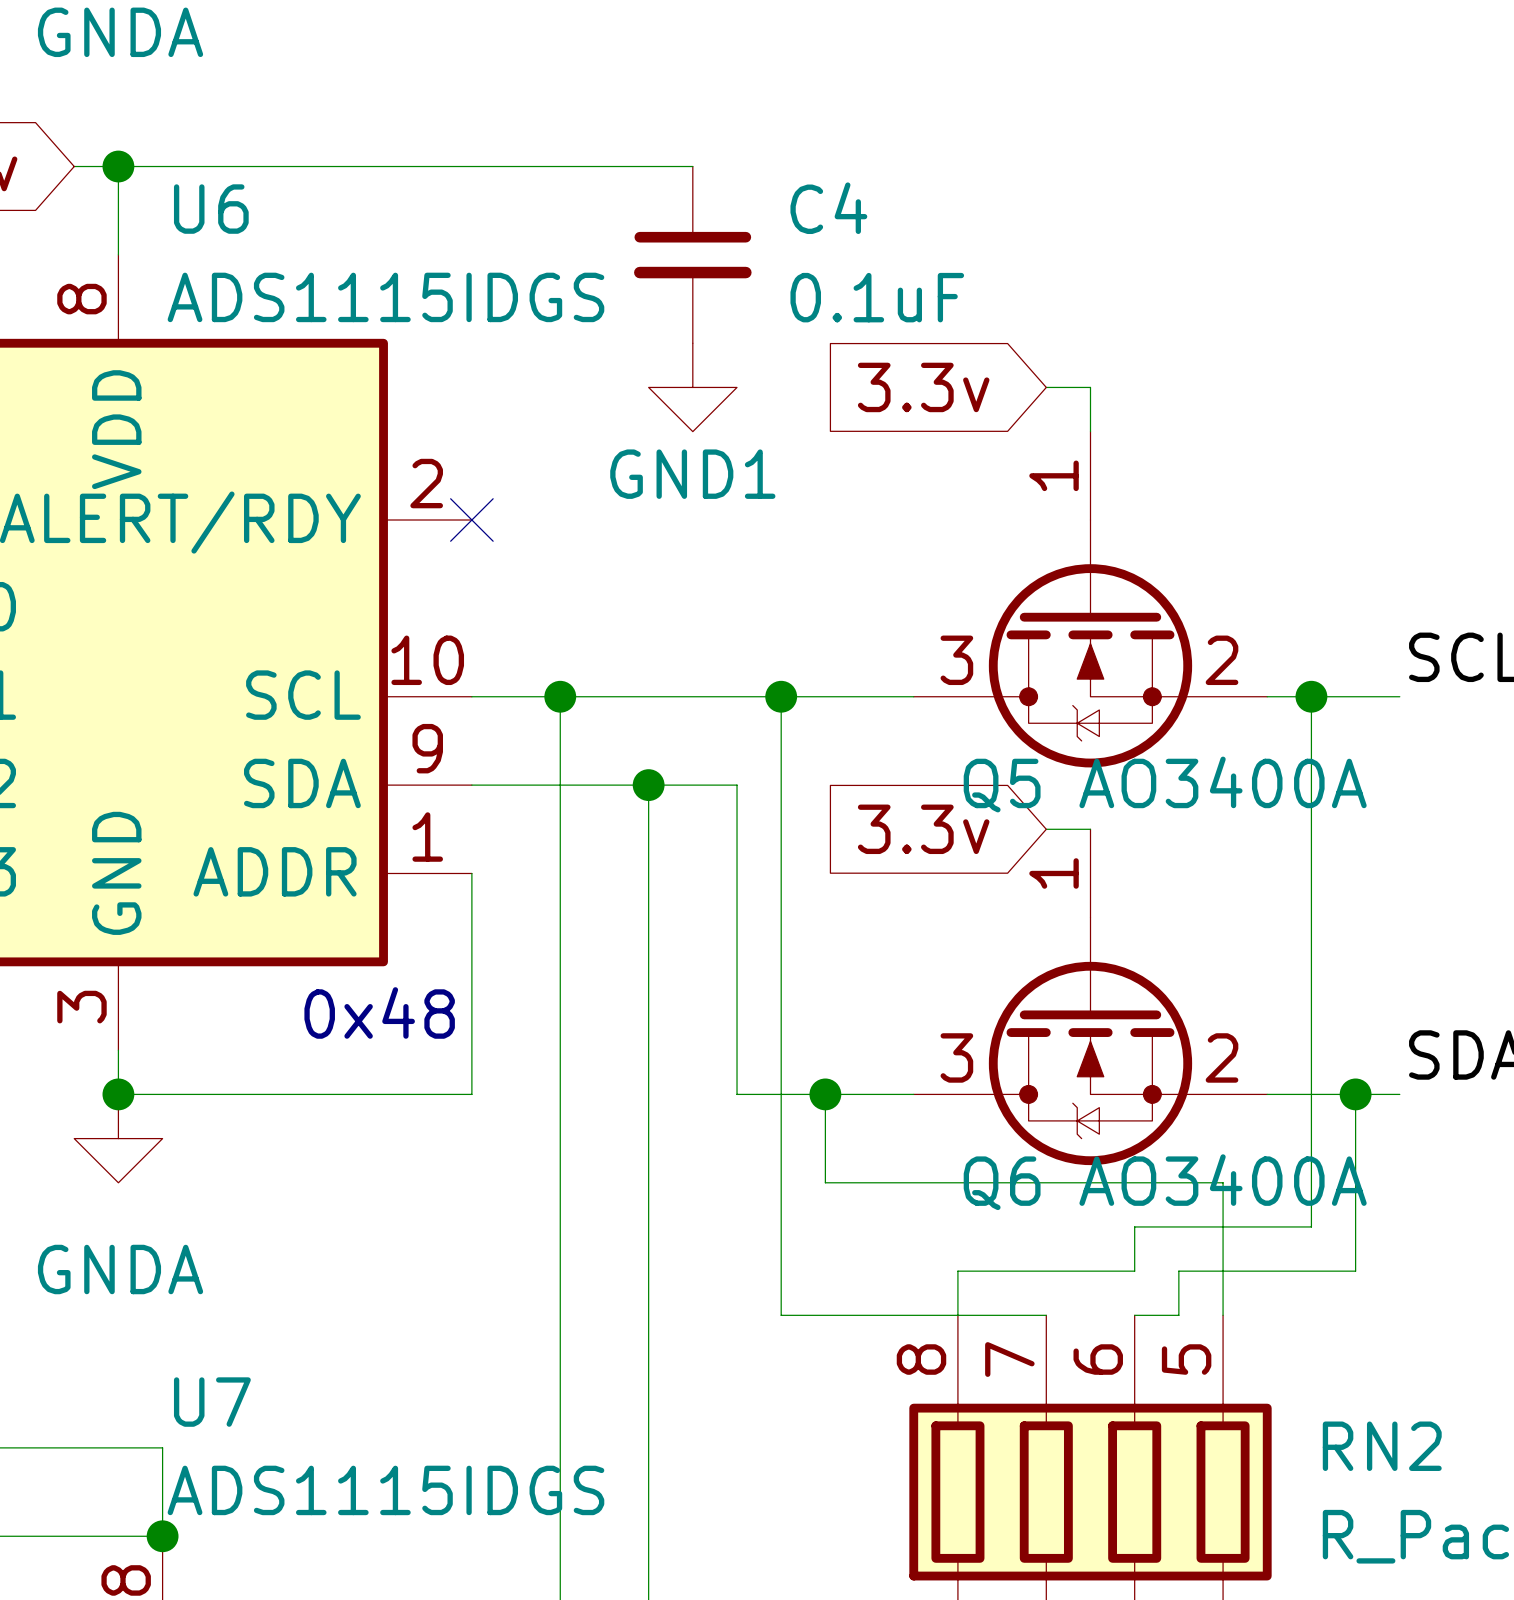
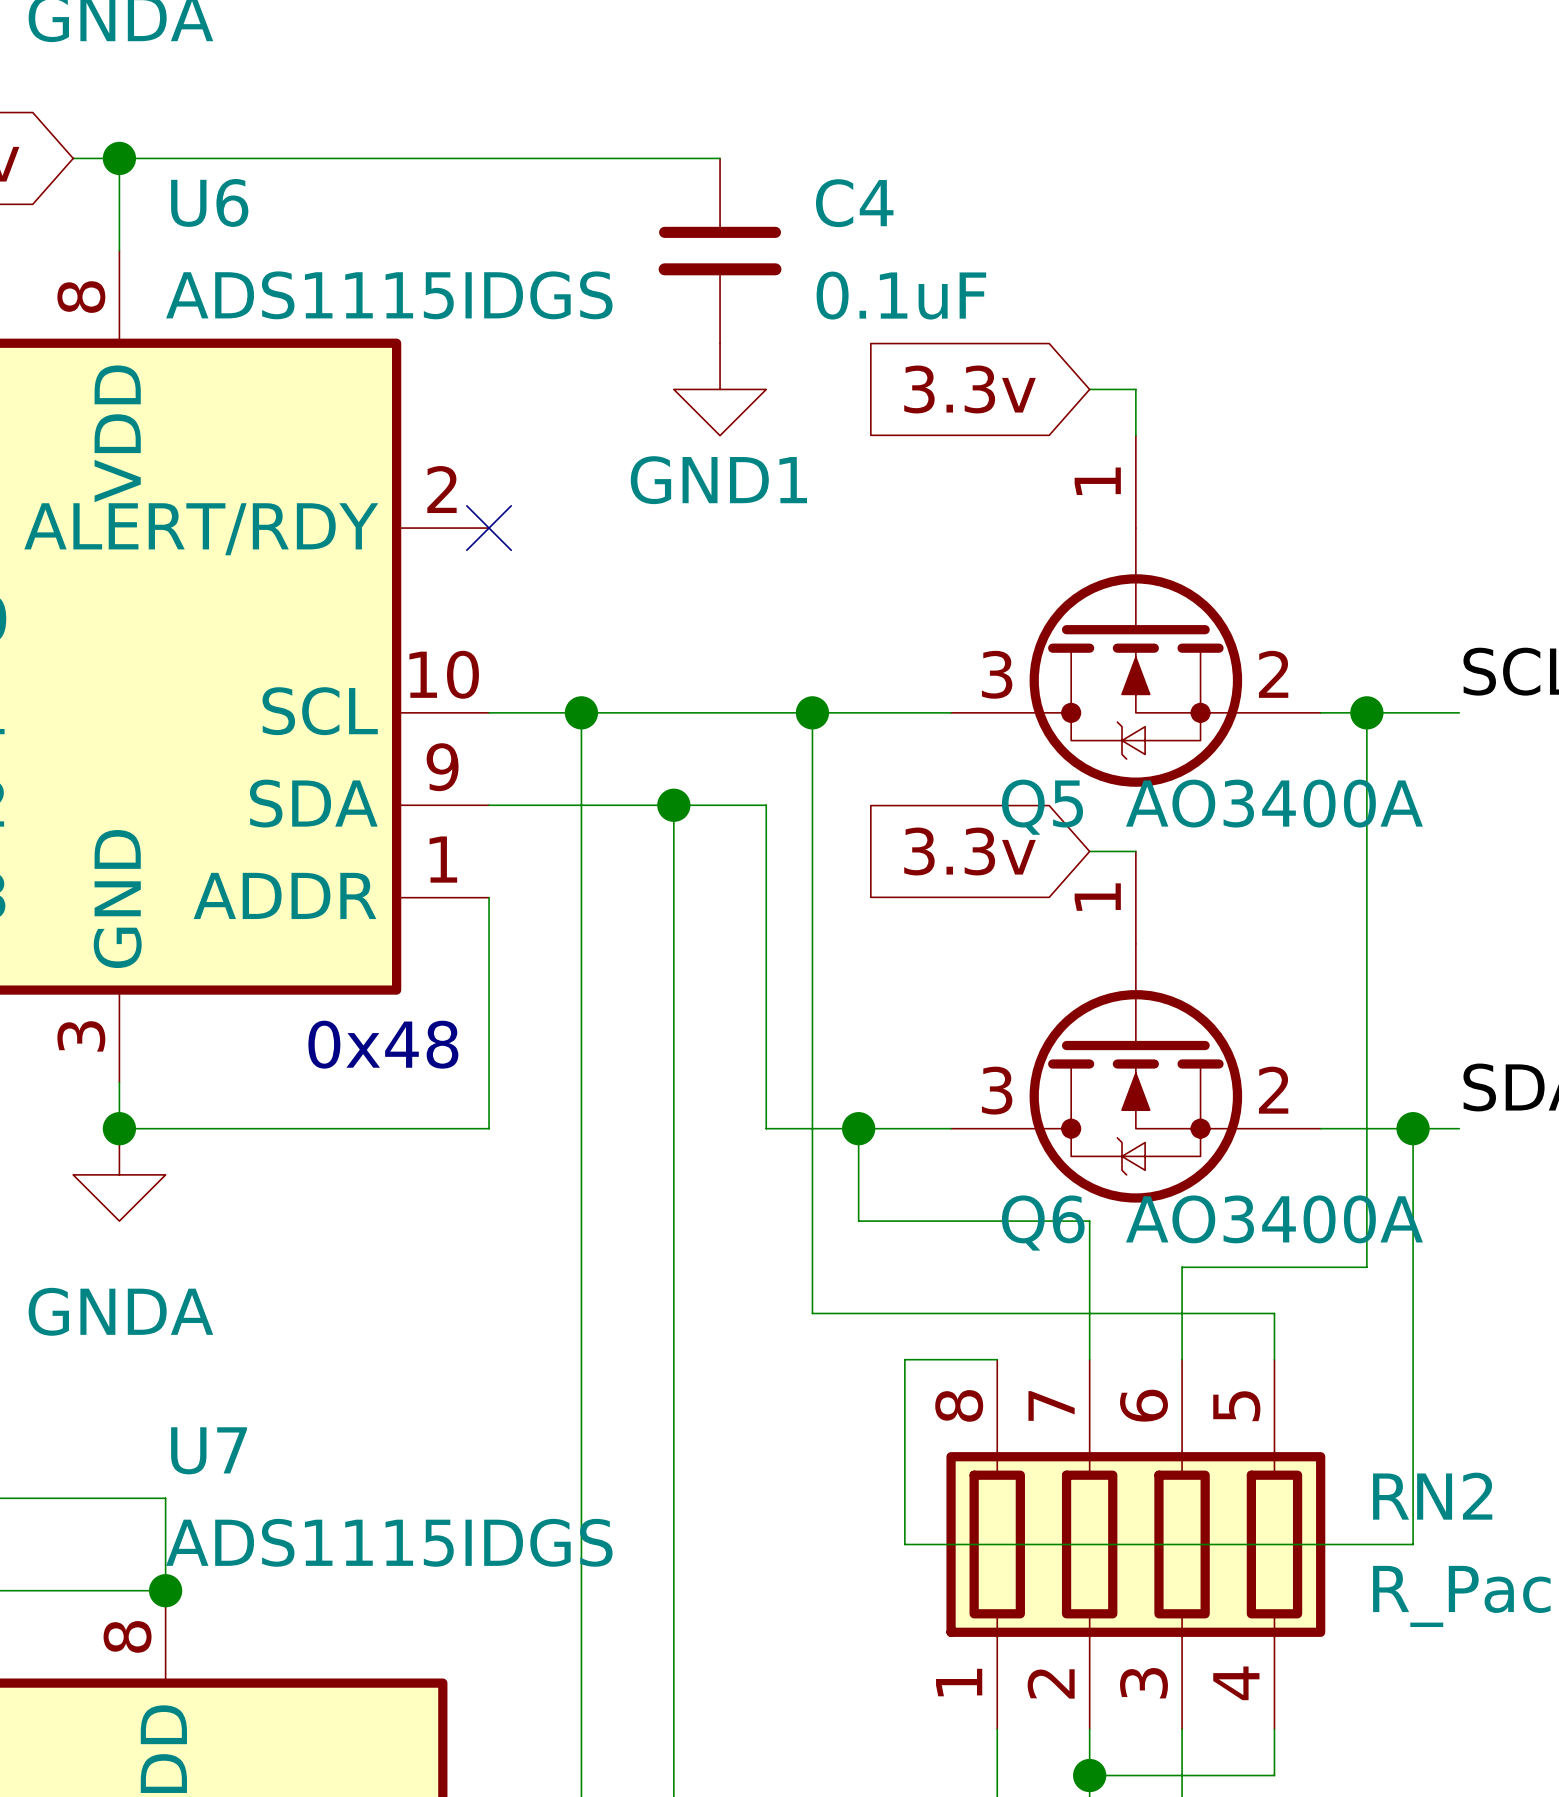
wire: (1046, 1182) (1223, 1182) (1223, 1271) (1355, 1271) -> (904, 1359) (904, 1544) (1413, 1544) (1413, 1313)
wire: (781, 1271) (781, 1315) (869, 1315) -> (812, 1313) (997, 1313)
wire: (957, 1271) (957, 1315) (1046, 1315) -> (1089, 1221) (1089, 1359)
wire: (1178, 1271) (1178, 1315) (1134, 1315) -> (1228, 1313) (1182, 1313) (1182, 1359)

